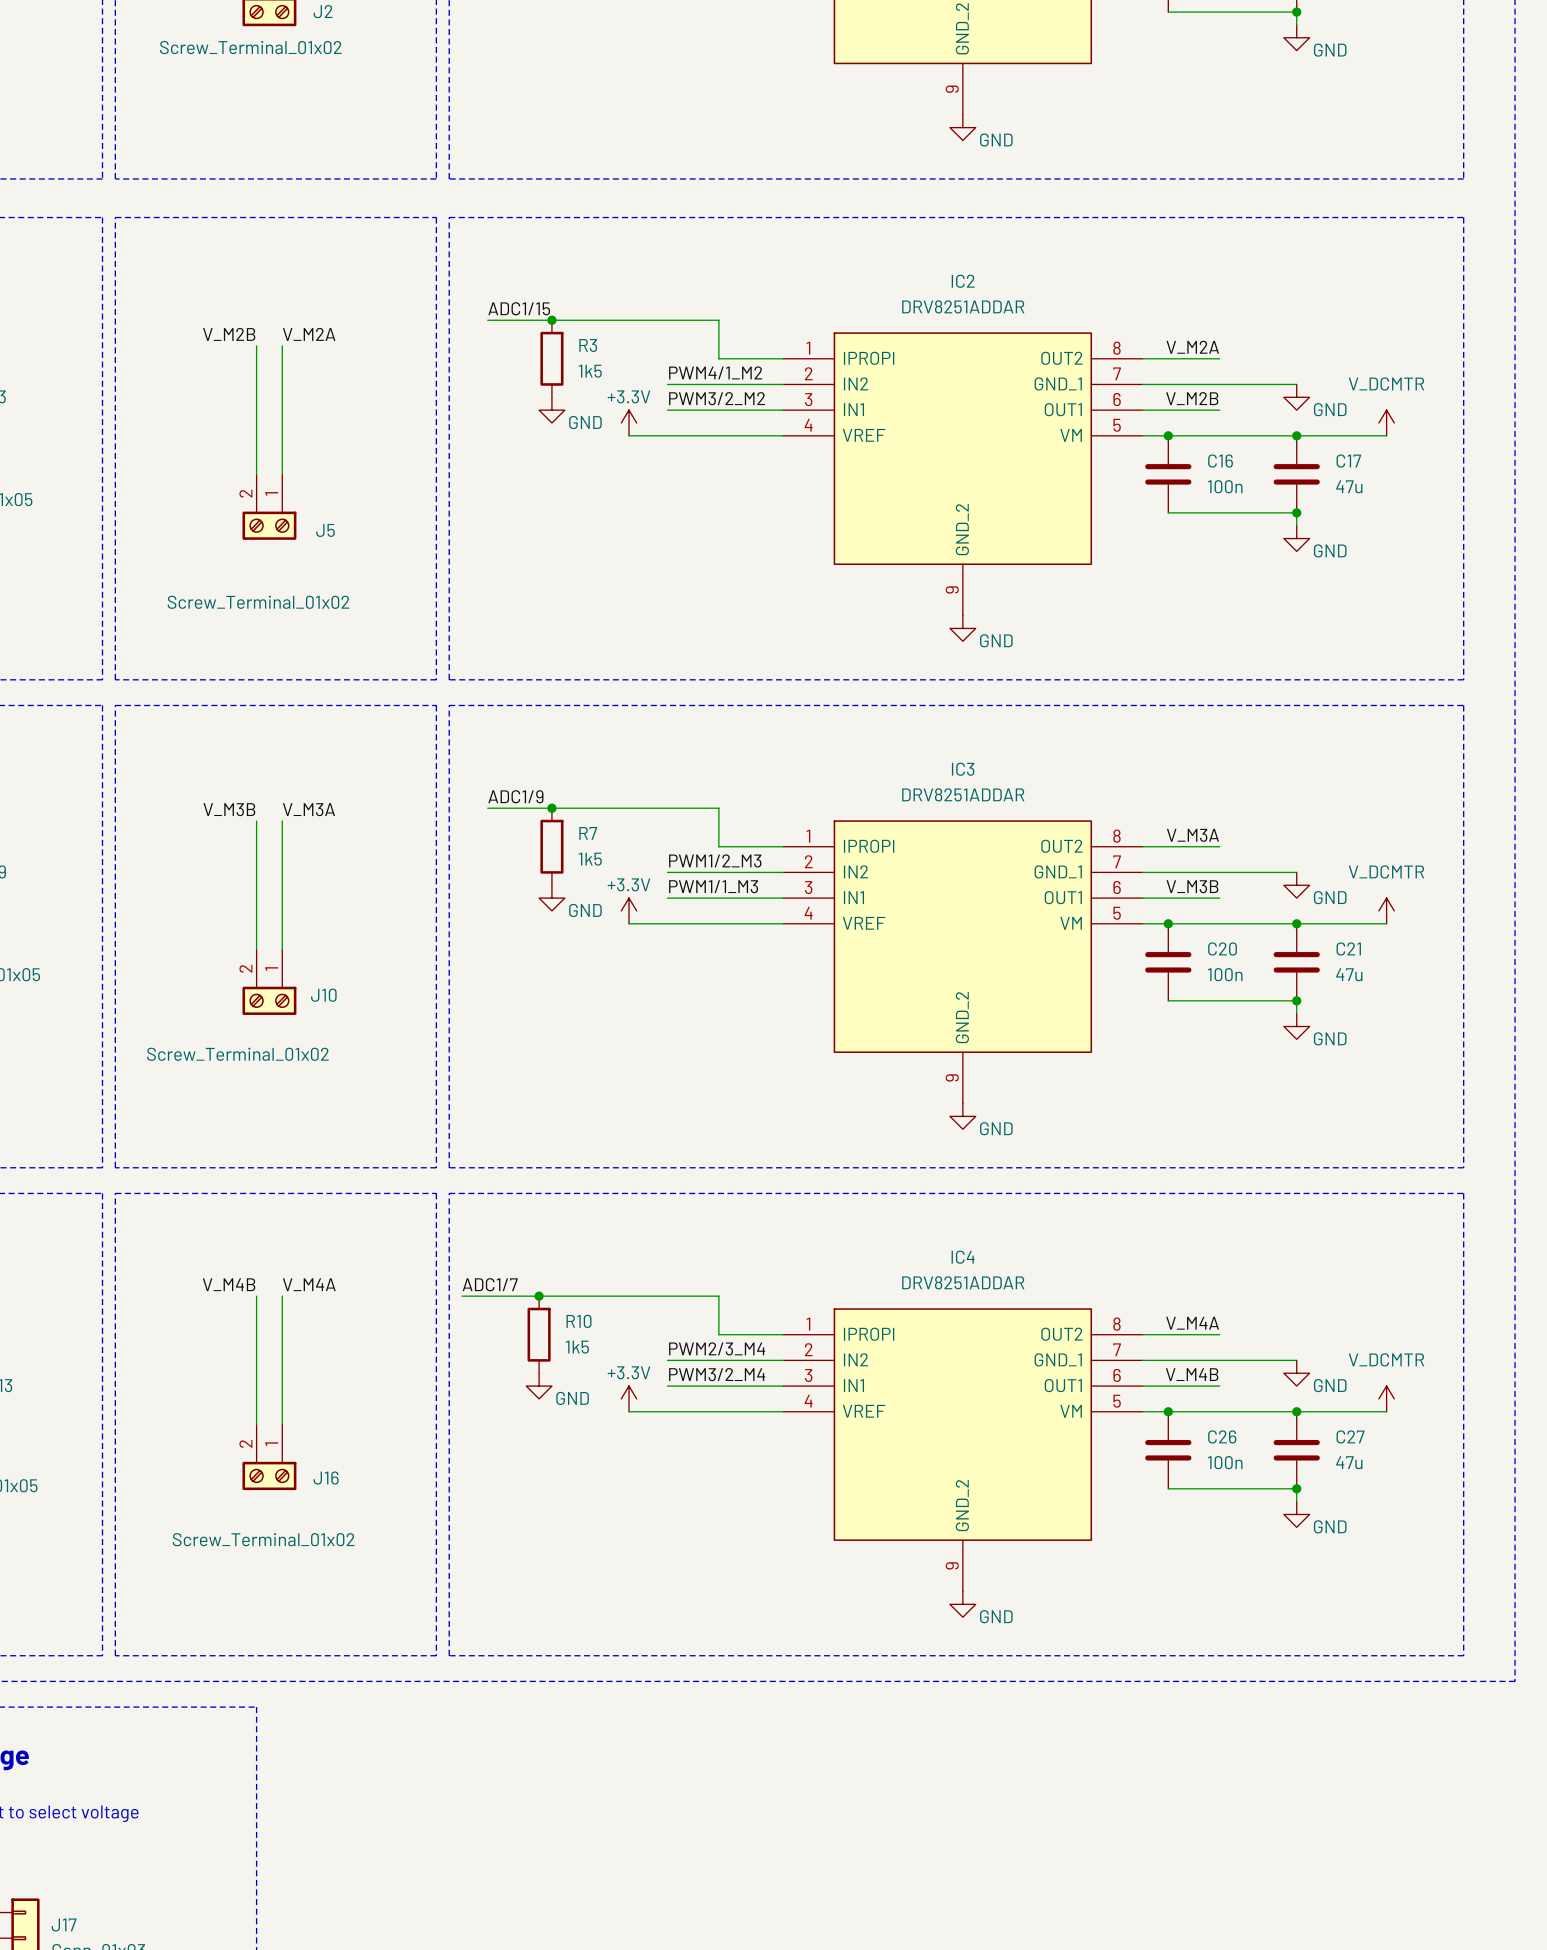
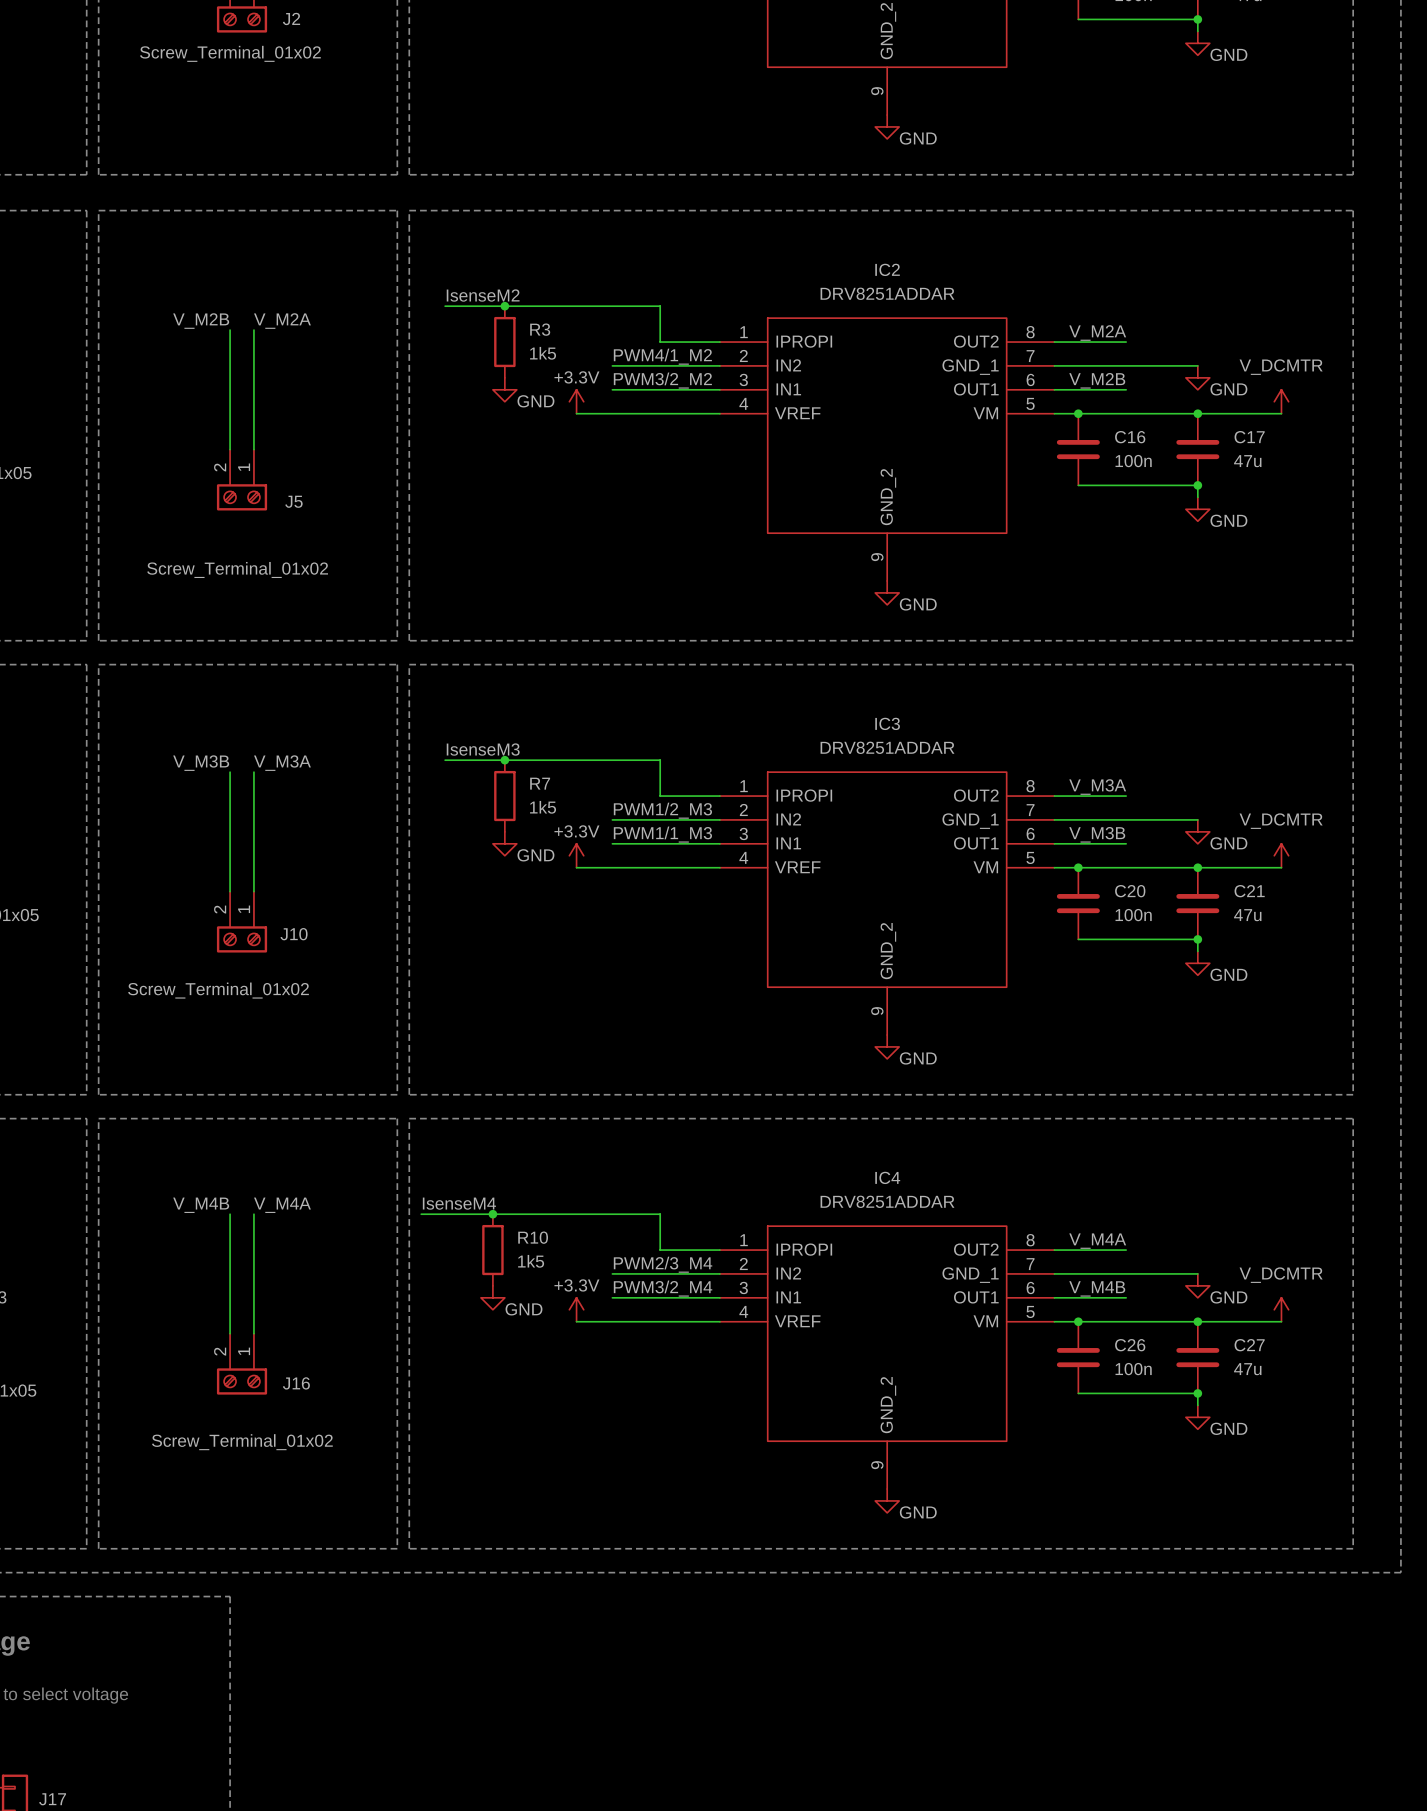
label: ADC1/15 (519, 308) -> IsenseM2 (483, 295)
label: ADC1/9 (515, 796) -> IsenseM3 (483, 749)
label: ADC1/7 (490, 1284) -> IsenseM4 (459, 1203)

